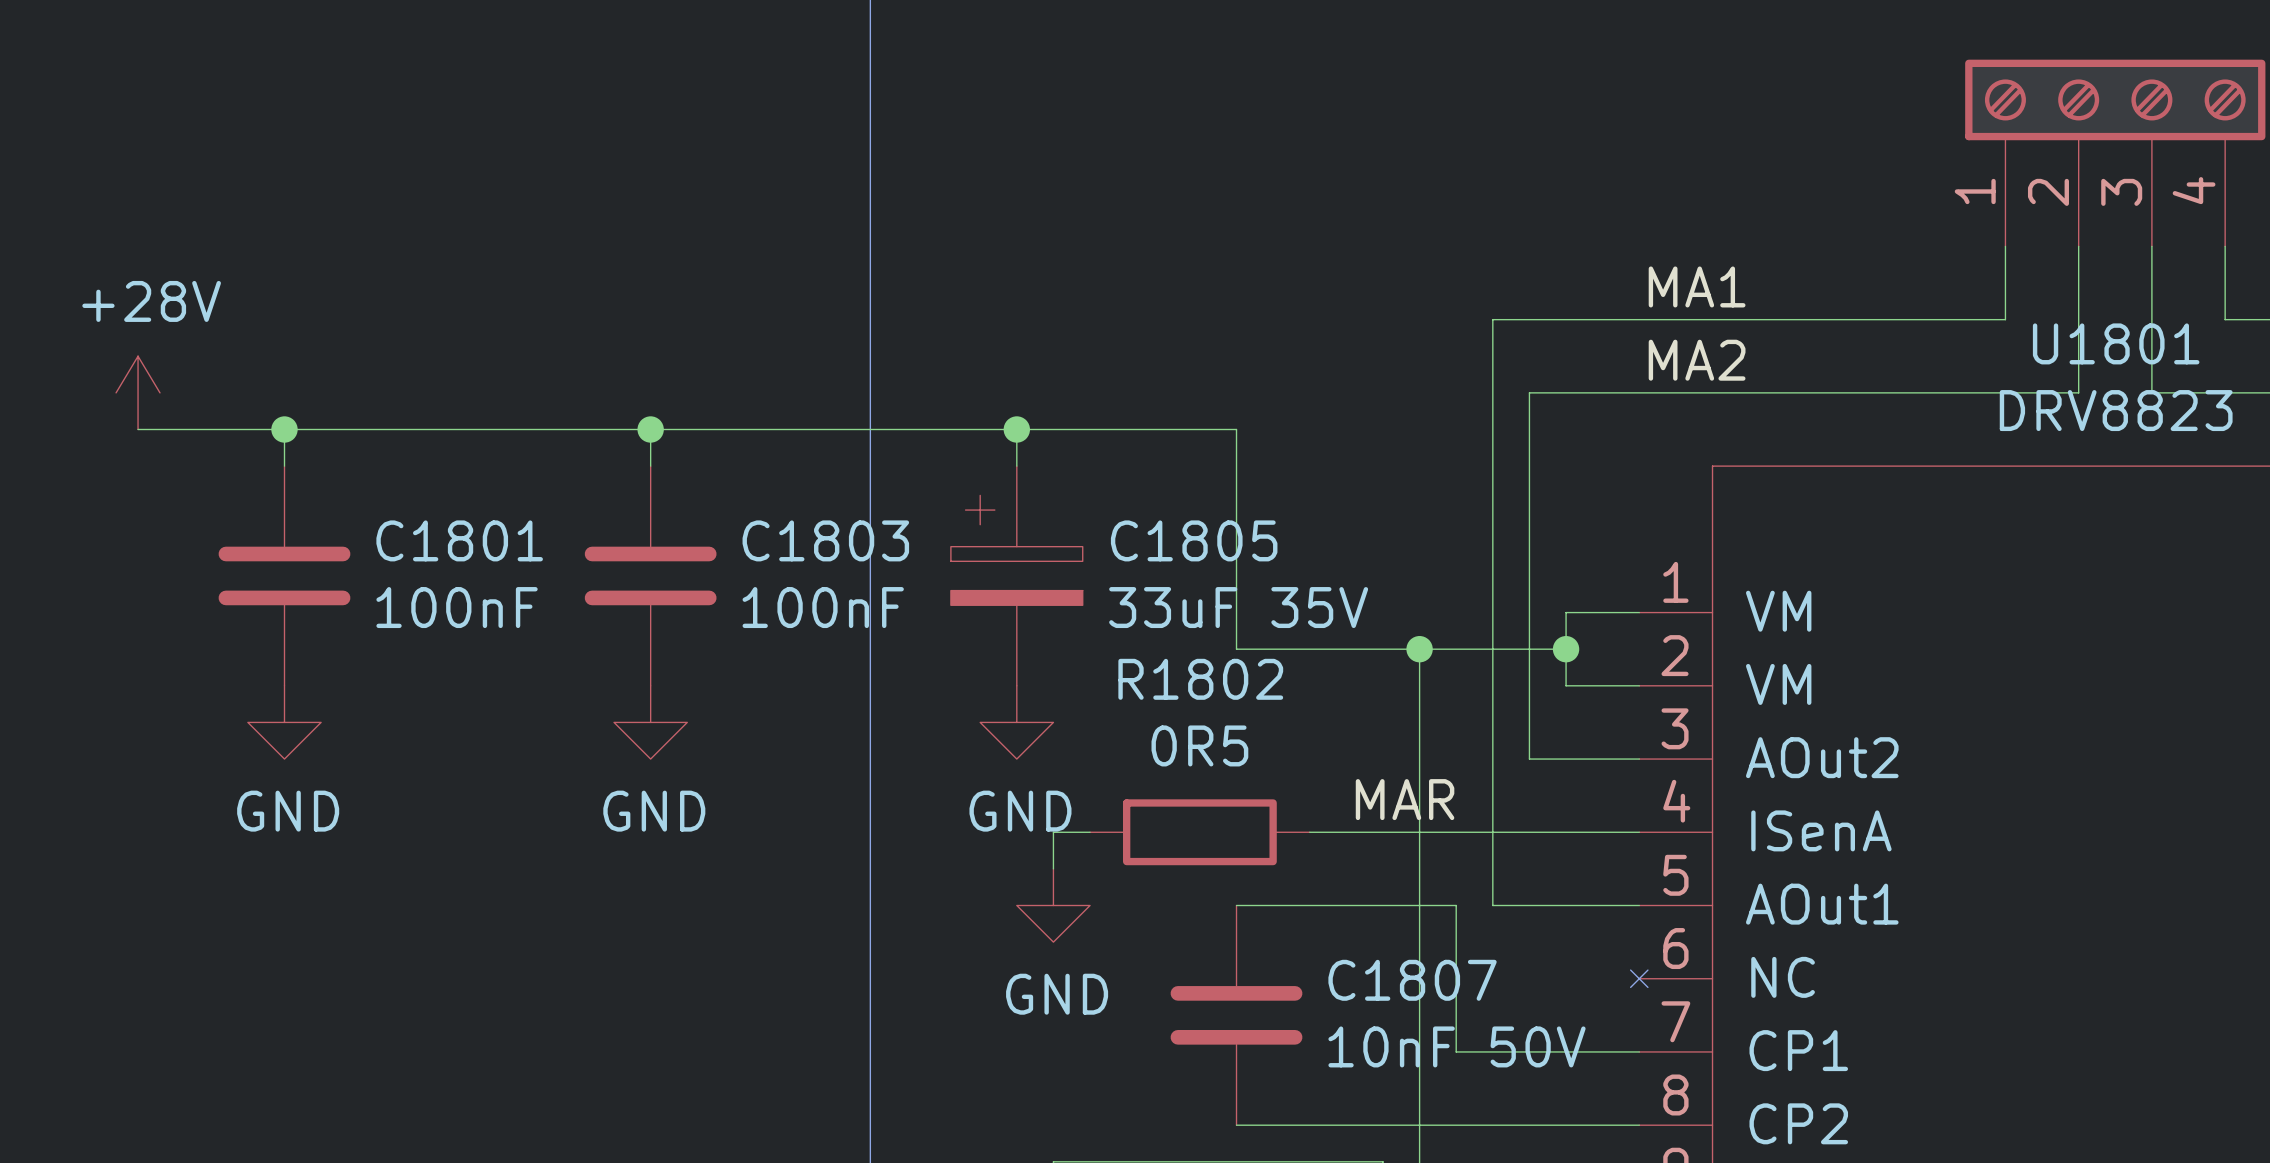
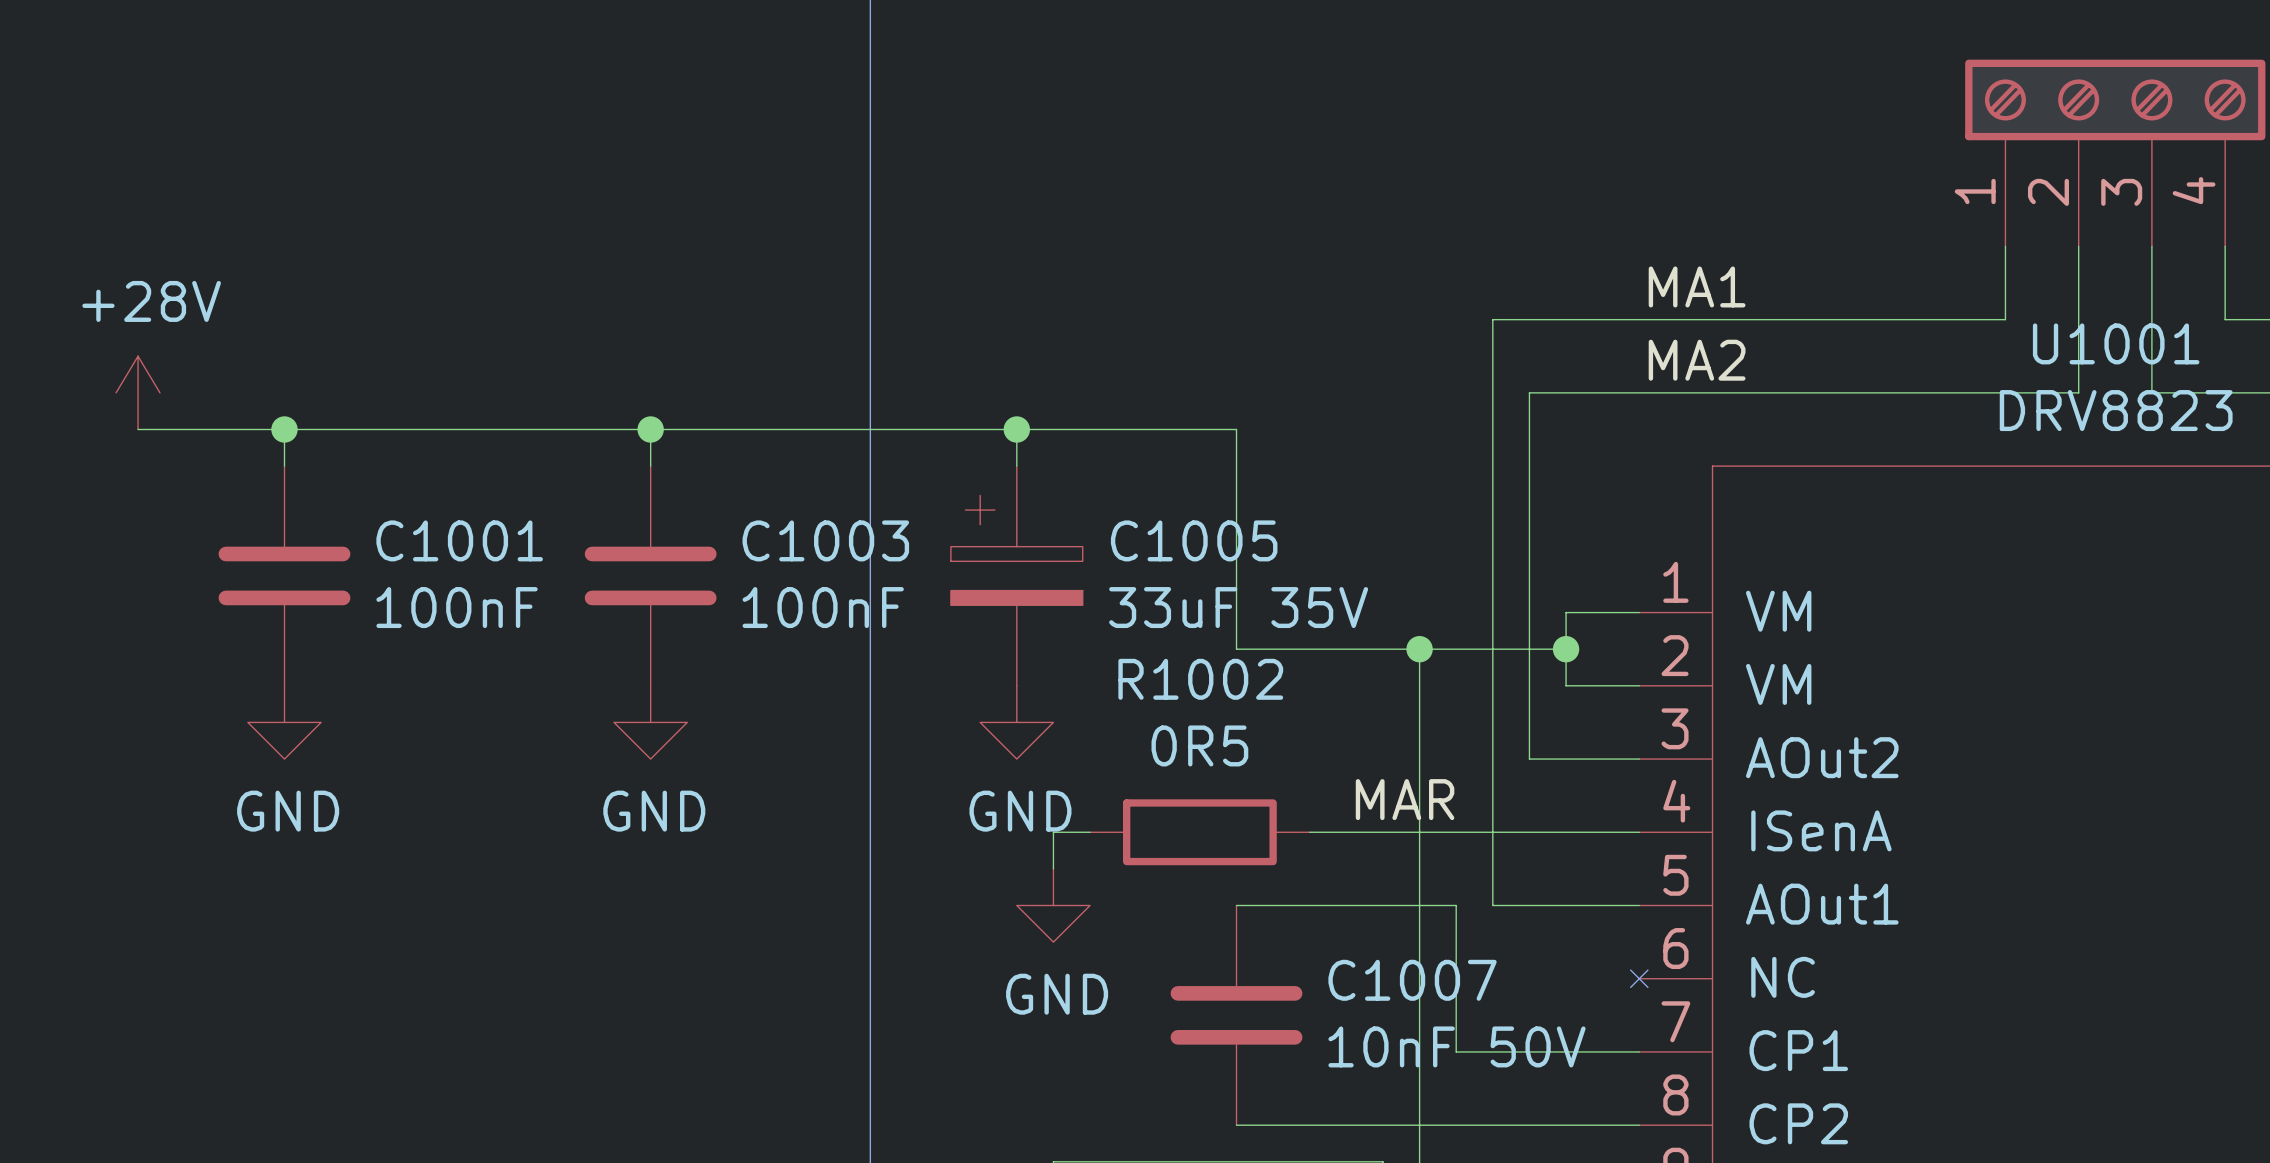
U1801 name: U1801 (2116, 343) -> U1001 (2116, 343)
C1801 name: C1801 (459, 540) -> C1001 (459, 540)
C1803 name: C1803 (825, 540) -> C1003 (825, 540)
C1805 name: C1805 (1194, 540) -> C1005 (1194, 540)
R1802 name: R1802 (1200, 679) -> R1002 (1200, 679)
C1807 name: C1807 (1412, 980) -> C1007 (1412, 980)

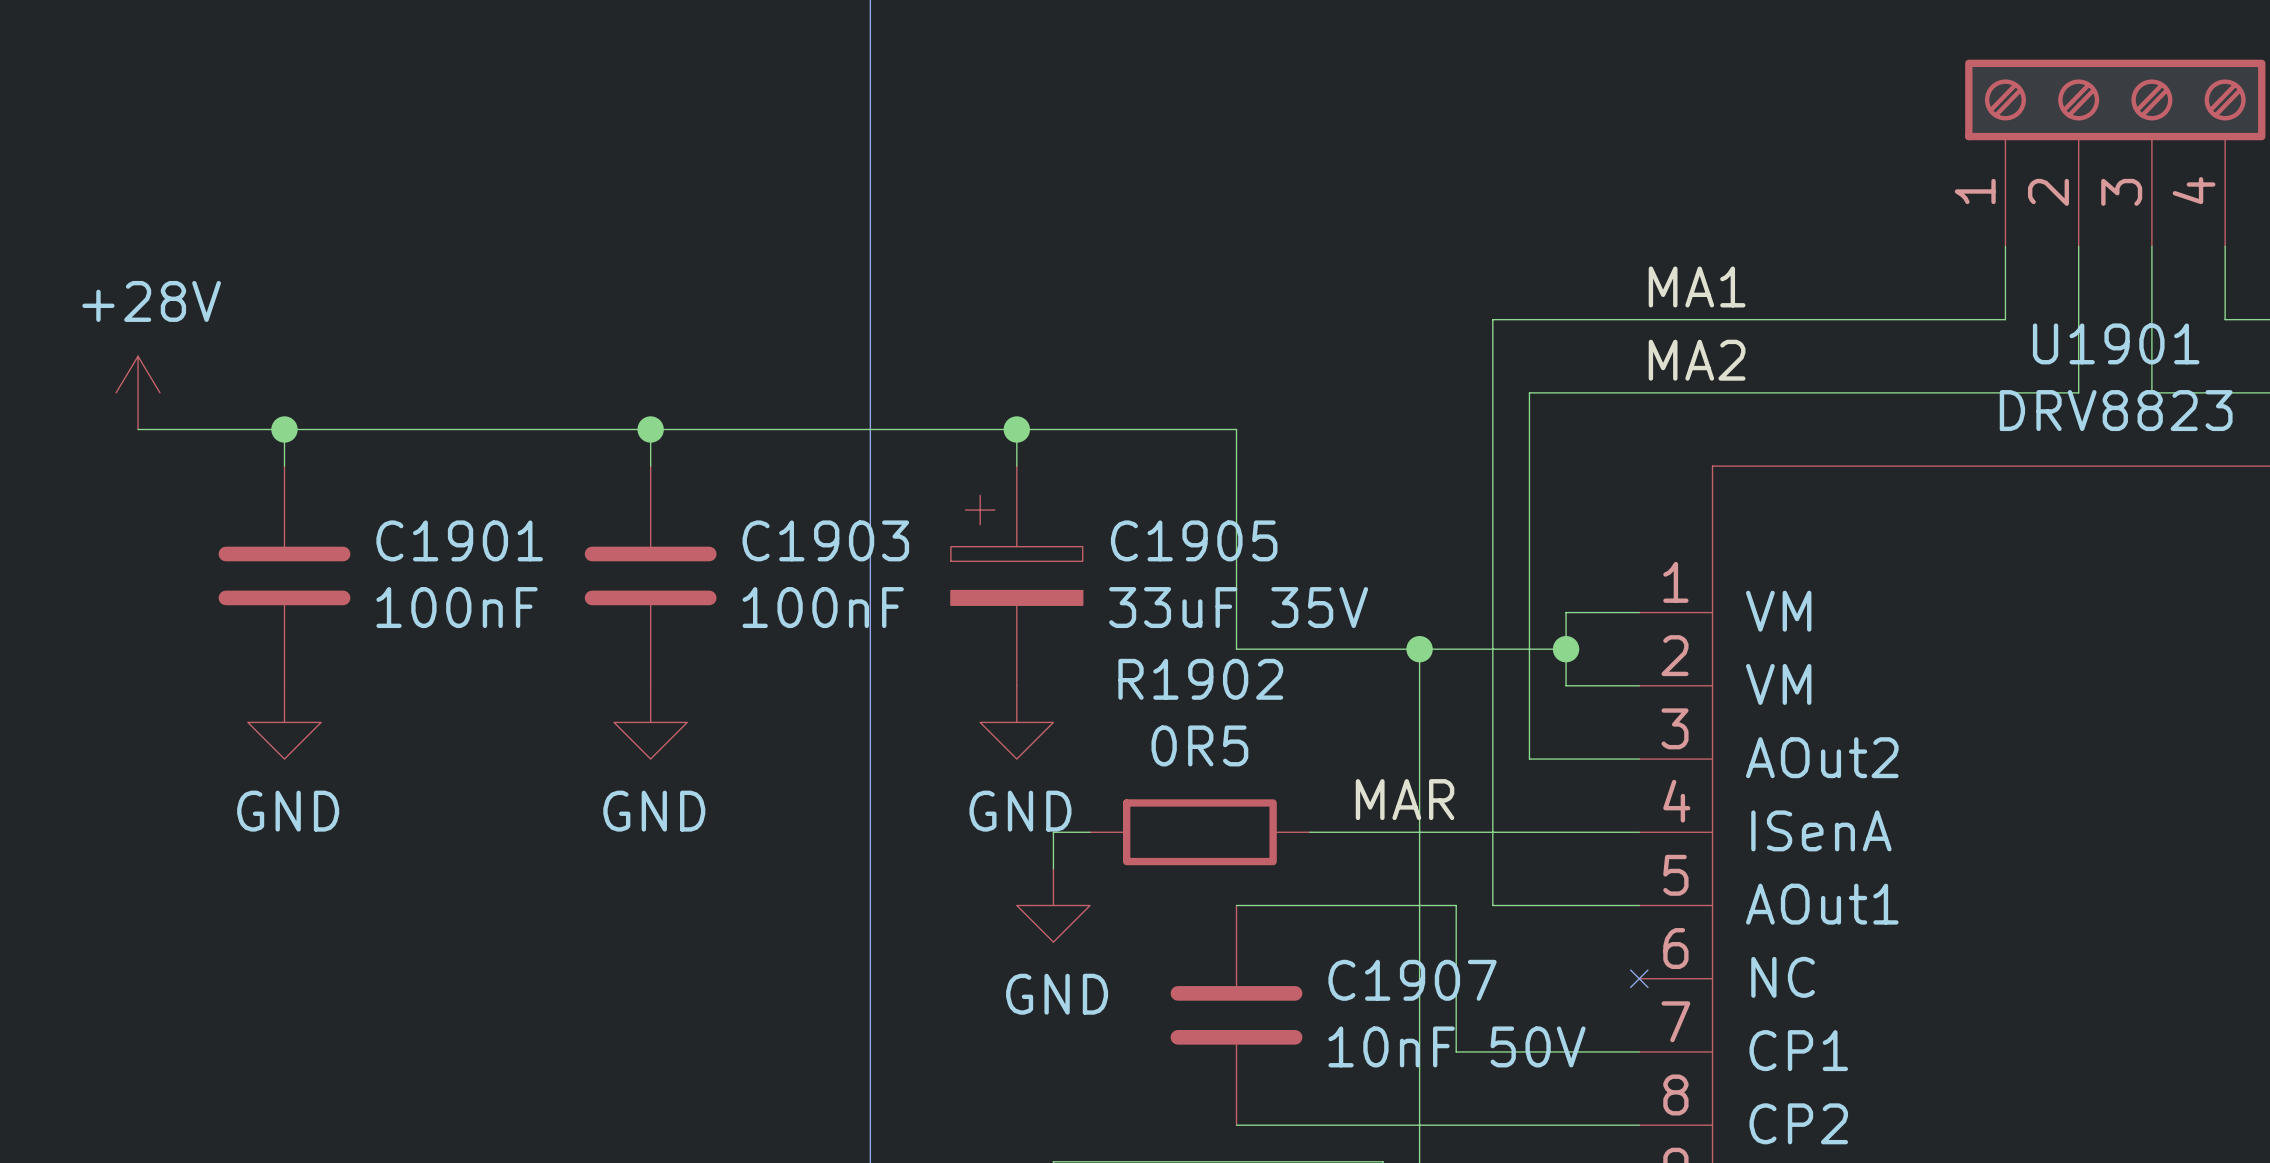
U1001 name: U1001 (2116, 343) -> U1901 (2116, 343)
C1001 name: C1001 (459, 540) -> C1901 (459, 540)
C1003 name: C1003 (825, 540) -> C1903 (825, 540)
C1005 name: C1005 (1194, 540) -> C1905 (1194, 540)
R1002 name: R1002 (1200, 679) -> R1902 (1200, 679)
C1007 name: C1007 (1412, 980) -> C1907 (1412, 980)

